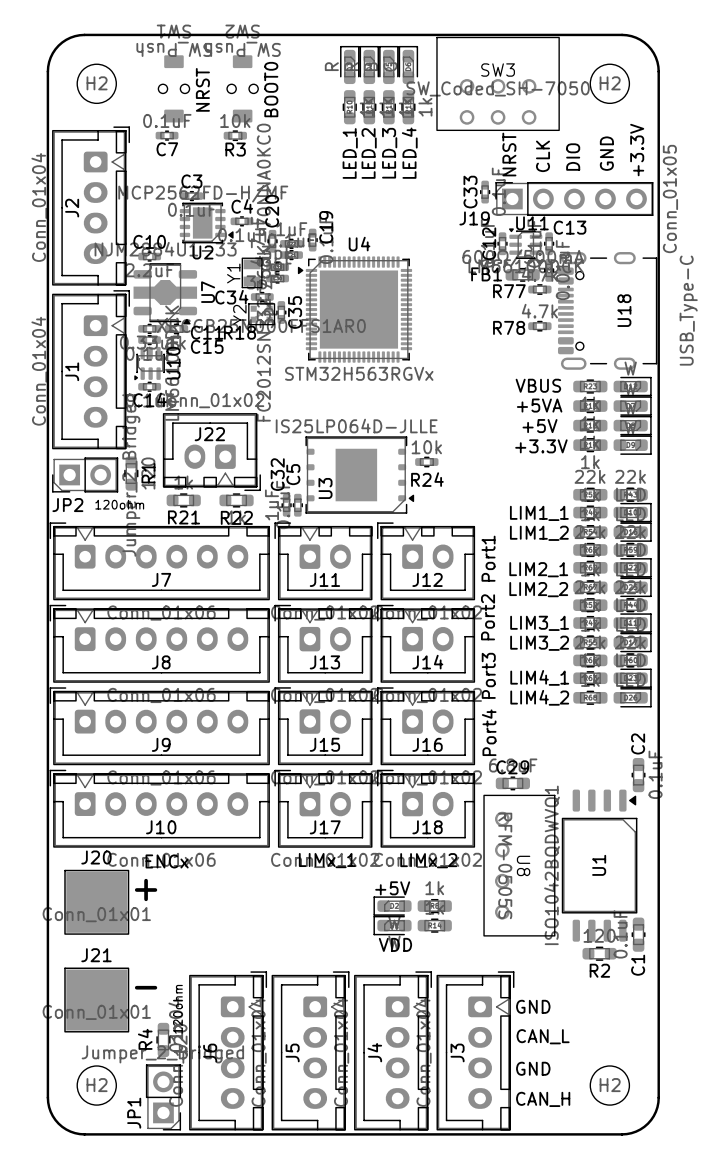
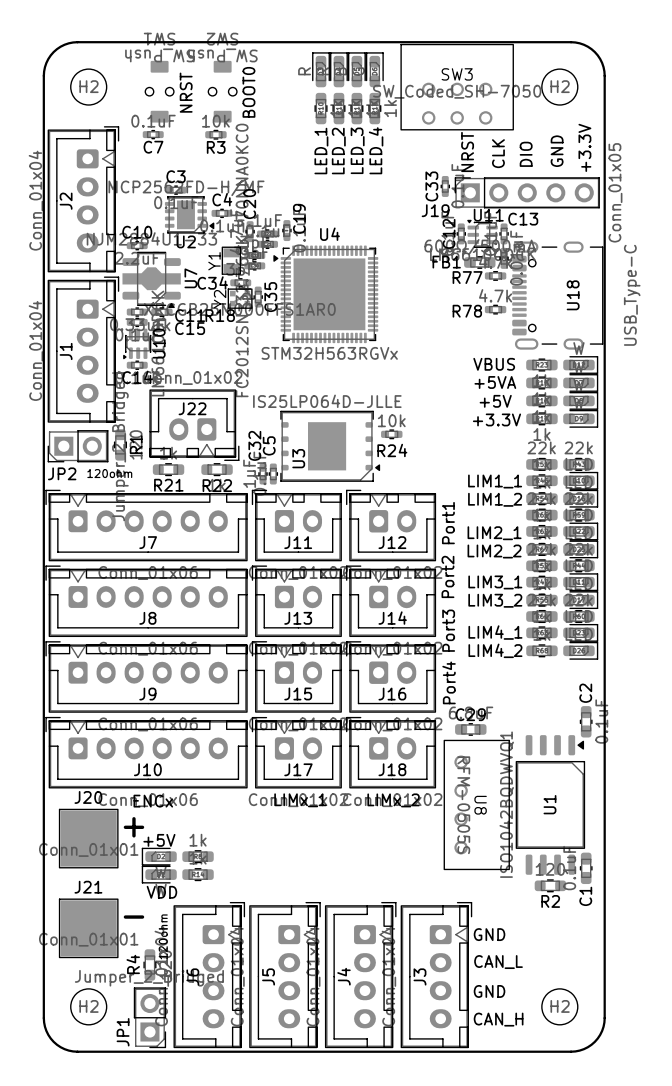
text position: +5V (392, 888) -> +5V (159, 840)
part position: (392, 906) -> (159, 856)
part position: (434, 906) -> (198, 856)
part position: (392, 925) -> (159, 874)
part position: (434, 925) -> (198, 874)
text position: VDD (395, 944) -> VDD (161, 892)

